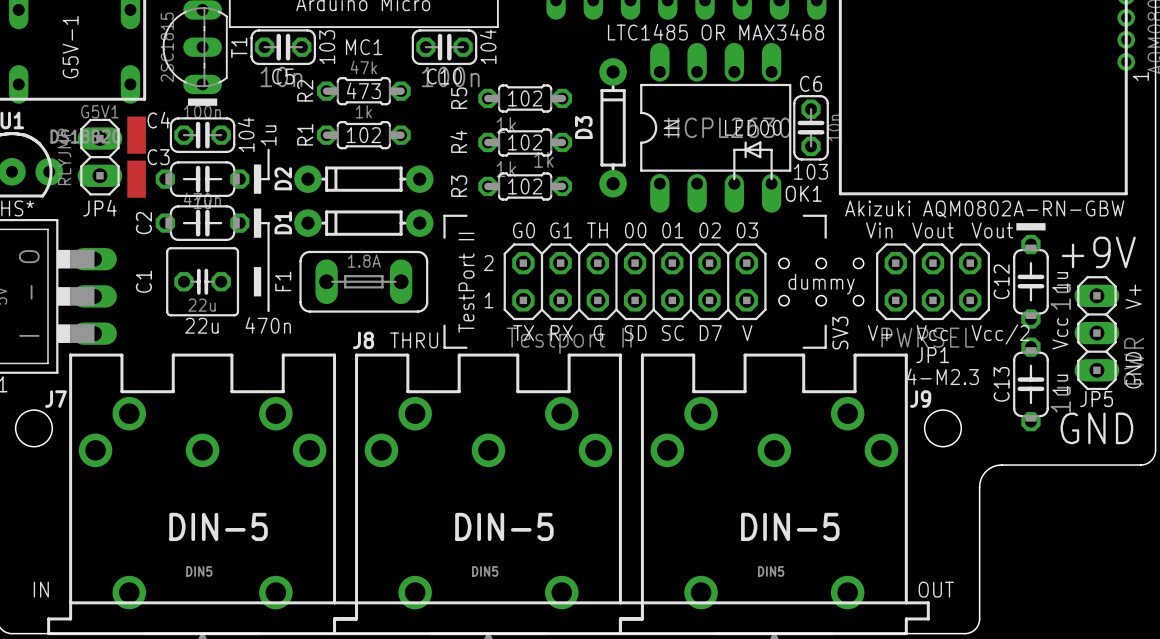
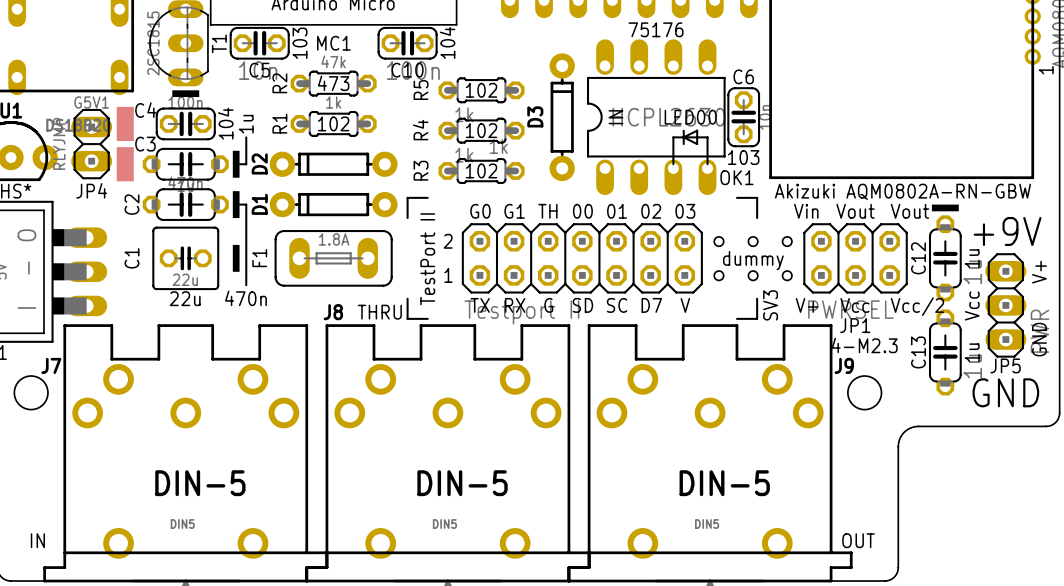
text: LTC1485 OR MAX3468 (716, 32) -> 75176 (656, 29)
text: G5V-1 (70, 47) -> none

